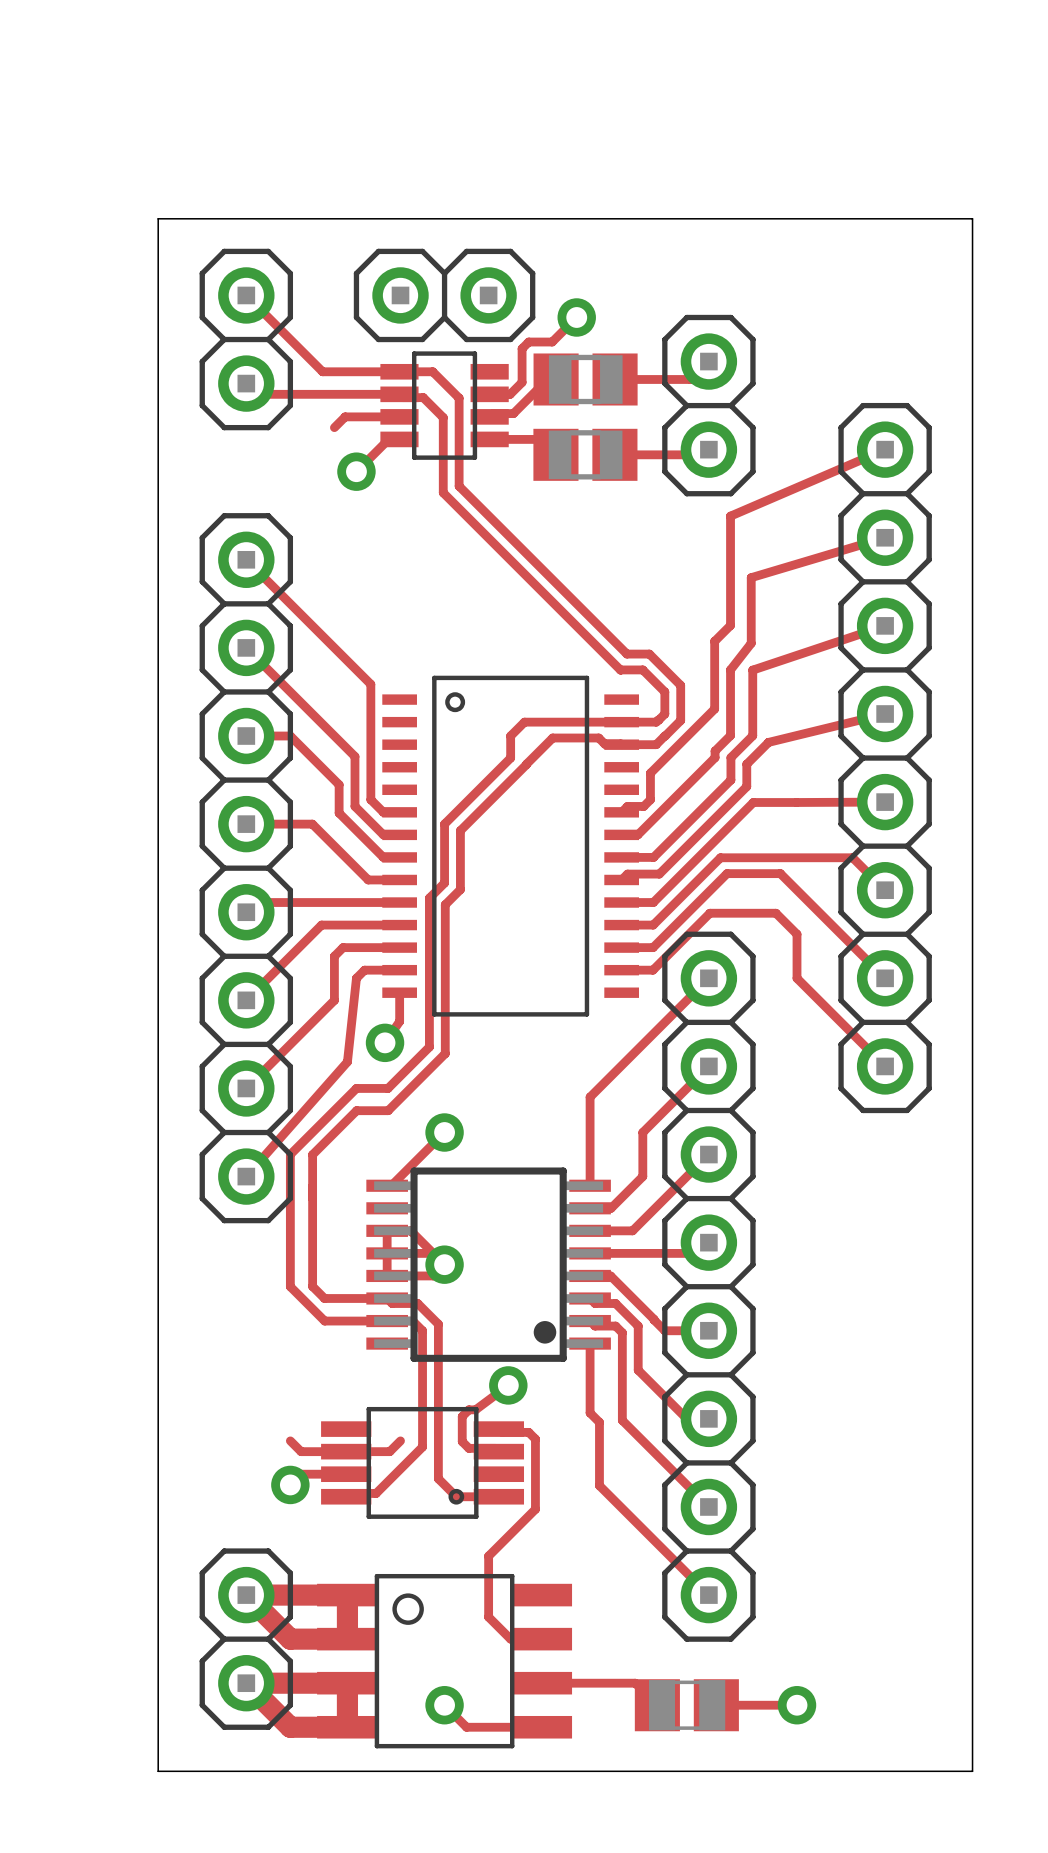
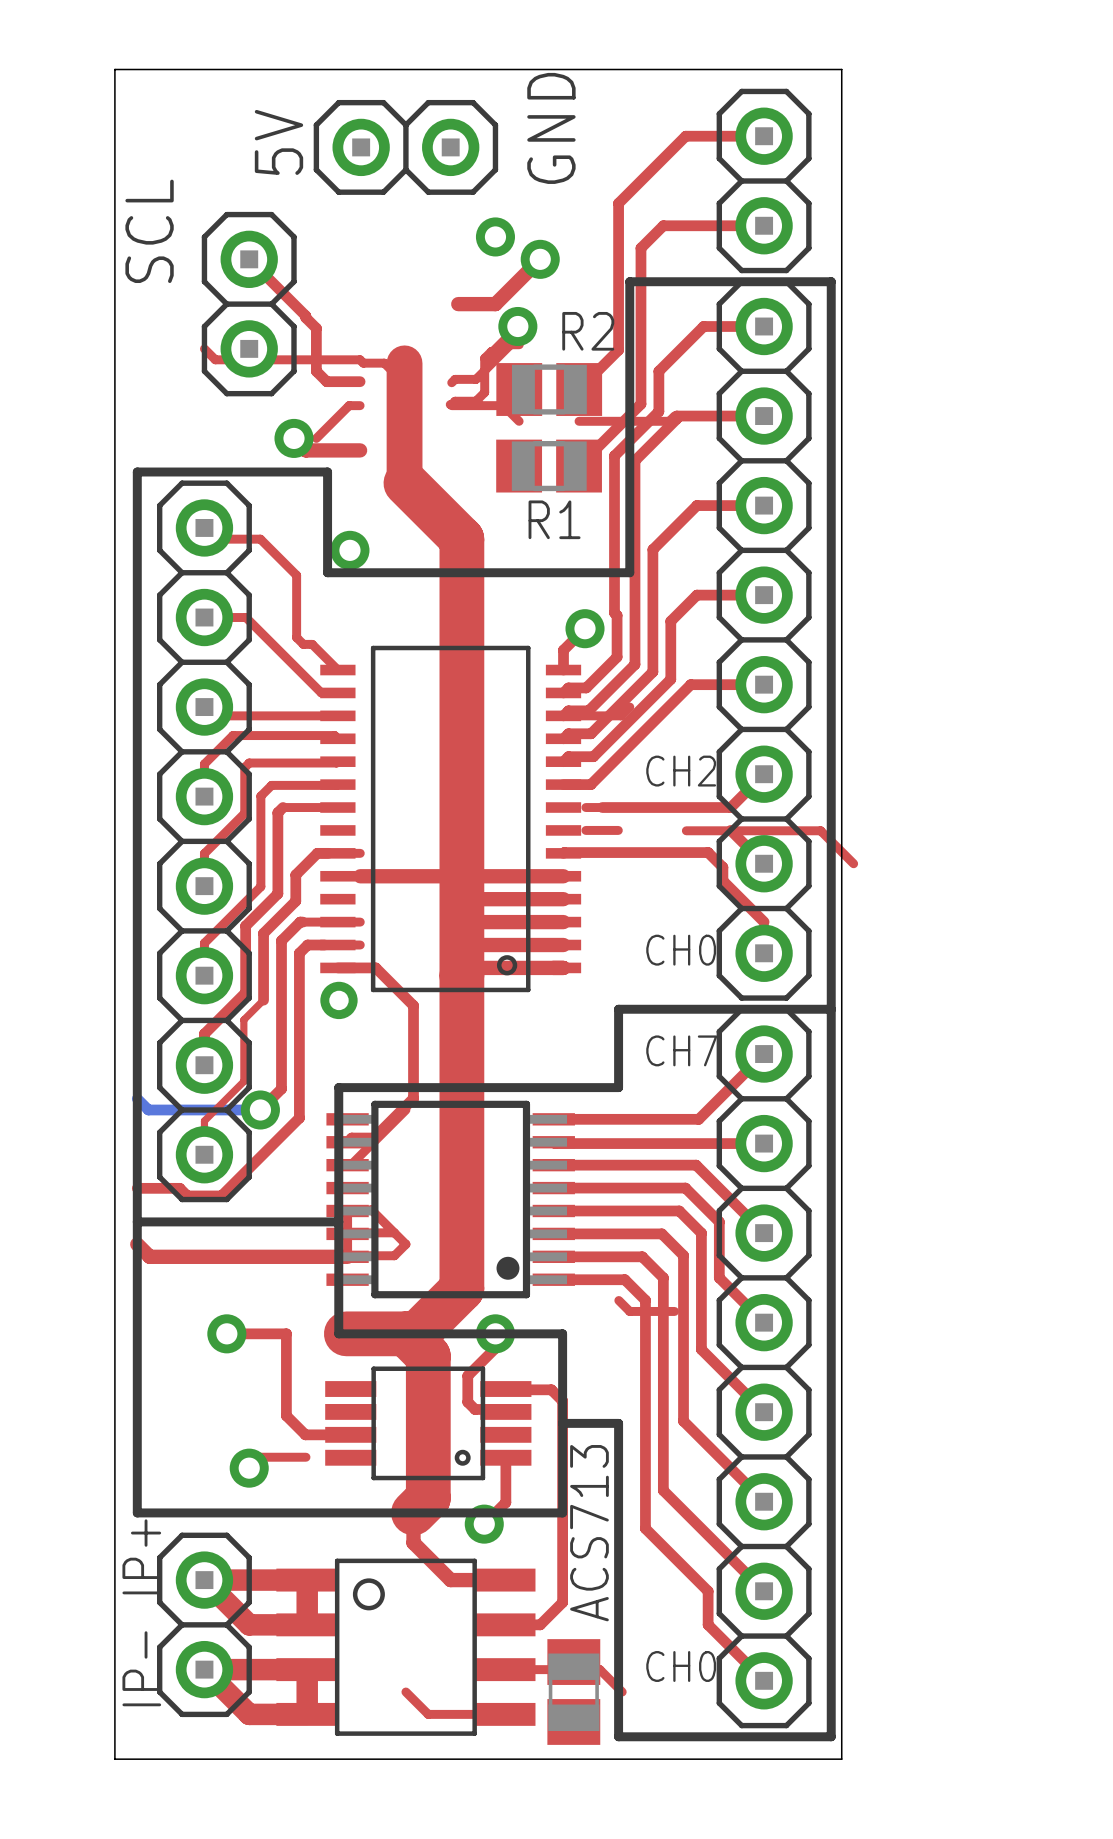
text: none -> GND (551, 128)
top track: none -> (764, 136) (685, 136) (618, 203) (618, 350) (579, 389)
text: none -> 5V (278, 142)
part: none -> (405, 147)
board edge: (158, 218) (972, 218) (972, 1771) (873, 1771) -> (114, 181) (114, 69) (841, 69) (841, 1759)
part: none -> (764, 180)
top track: none -> (764, 225) (663, 225) (640, 248) (640, 404) (579, 466)
text: none -> SCL (149, 231)
via: none -> (495, 236)
top track: (246, 295) (322, 371) (432, 371) (459, 398) (459, 486) (626, 654) (649, 654) (680, 685) (680, 720) (665, 736) -> none
part: (444, 295) -> none
top track: none -> (540, 259) (495, 304) (458, 304)
top track: (576, 317) (552, 342) (528, 342) (522, 348) (522, 382) (510, 394) (489, 394) -> none
via position: (576, 317) -> (540, 259)
part position: (246, 339) -> (249, 304)
top track: none -> (517, 326) (484, 358) (484, 392) (475, 401) (455, 401) (450, 404)
via: none -> (517, 326)
top track: (708, 361) (690, 379) (615, 379) -> none
top track: none -> (764, 326) (703, 326) (658, 371) (658, 411) (614, 455) (614, 612) (617, 615) (617, 657) (586, 687) (568, 687) (563, 692)
part: (585, 379) -> none
part: (444, 405) -> none
part: (708, 405) -> none
top track: (399, 416) (345, 416) (334, 427) -> (360, 381) (326, 381) (316, 371) (316, 328) (249, 259)
top track width: thin (443, 417) (443, 492) -> thick (404, 383) (404, 459)
R2: none -> (549, 389)
top track: none -> (764, 416) (676, 416) (676, 418) (634, 460) (634, 664) (588, 710) (568, 710) (563, 715)
top track: (885, 449) (730, 516) (730, 625) (714, 641) (714, 709) (650, 773) (650, 799) (643, 806) (627, 806) (621, 812) -> none
part: (585, 454) -> none
top track: none -> (293, 438) (305, 450) (360, 450)
via position: (356, 471) -> (293, 438)
top track: (443, 492) (620, 670) -> (404, 459) (404, 481) (461, 539) (461, 1289) (417, 1333) (346, 1333)
R1: none -> (549, 466)
top track: none -> (764, 505) (696, 505) (652, 549) (652, 671) (591, 733) (568, 733) (563, 738)
top track: (885, 537) (751, 577) (751, 643) (730, 669) (730, 735) (715, 751) (715, 757) (637, 834) -> (764, 774) (730, 807) (602, 807)
top track: (257, 570) (370, 684) (370, 799) (383, 812) (399, 812) -> (215, 539) (260, 539) (296, 575) (296, 637) (303, 644) (312, 644) (337, 670)
via: none -> (349, 550)
top track: none -> (764, 595) (696, 595) (670, 621) (670, 679) (593, 756) (568, 756) (563, 761)
top track: (885, 625) (752, 670) (752, 735) (730, 757) (730, 780) (653, 857) -> none
top track: (246, 647) (354, 756) (354, 806) (383, 834) (399, 834) -> (204, 617) (245, 617) (321, 692) (337, 692)
top track: none -> (585, 628) (563, 650) (563, 670)
via: none -> (585, 628)
top track: (620, 669) (642, 669) (664, 691) (664, 713) (656, 722) (524, 722) (510, 736) (510, 758) (444, 824) (444, 883) (429, 898) (429, 1047) (388, 1088) (356, 1088) (290, 1154) (290, 1286) (324, 1321) (412, 1321) (422, 1330) (422, 1447) (376, 1493) (349, 1493) (346, 1496) -> none
top track: none -> (764, 684) (690, 684) (590, 784) (563, 784)
top track: (885, 713) (768, 742) (746, 764) (746, 786) (659, 874) (627, 874) (621, 879) -> none
top track: (246, 736) (290, 736) (339, 784) (339, 813) (383, 857) (399, 857) -> (204, 707) (213, 715) (337, 715)
top track: (621, 744) (604, 743) (598, 738) (552, 738) (526, 764) -> none
part position: (885, 758) -> (764, 639)
top track: (526, 764) (460, 830) (460, 889) (445, 904) (445, 1053) (388, 1110) (356, 1110) (312, 1154) (312, 1286) (324, 1298) (387, 1298) (392, 1303) (417, 1303) (438, 1324) (438, 1478) (456, 1496) (498, 1496) -> none
text: none -> CH2 (681, 771)
top track: (885, 802) (753, 802) (653, 902) (621, 902) -> none
top track: (246, 824) (312, 824) (368, 879) -> (204, 796) (204, 764) (232, 735) (334, 735) (337, 738)
top track: none -> (283, 807) (277, 812) (277, 893) (245, 925) (245, 992) (204, 1033) (204, 1065)
top track: none -> (283, 807) (337, 807)
part rotation: 0° (510, 846) -> 180° (450, 818)
top track: (720, 857) (653, 925) (621, 925) -> none
top track: (780, 873) (727, 873) (653, 947) (621, 947) -> (747, 846) (730, 830)
top track: none -> (328, 853) (317, 853) (295, 874) (295, 901) (263, 933) (263, 1000) (243, 1019) (243, 1081) (204, 1120) (204, 1154)
top track: (797, 890) (885, 978) -> none
top track: (377, 902) (256, 902) (246, 912) -> (337, 761) (249, 763) (244, 767) (244, 813) (204, 853) (204, 886)
top track: none -> (360, 876) (563, 876)
top track: none -> (461, 897) (463, 899) (563, 899)
top track: (399, 925) (321, 925) (246, 1000) -> (337, 784) (271, 785) (260, 796) (260, 886) (204, 943) (204, 975)
top track: none -> (461, 919) (473, 919) (475, 922) (563, 922)
top track: (343, 947) (334, 956) (334, 1000) (246, 1088) -> (302, 922) (300, 922) (281, 940) (281, 1088) (260, 1109)
top track: (797, 947) (797, 934) (775, 913) (709, 913) (652, 970) (621, 970) -> (764, 922) (722, 880) (722, 867) (708, 852) (563, 853)
top track: none -> (461, 942) (464, 945) (563, 945)
top track: (364, 970) (356, 978) (347, 1061) (246, 1176) -> (324, 945) (307, 945) (299, 953) (299, 1118) (221, 1195) (187, 1195) (179, 1188) (137, 1188)
text: none -> CH0 (681, 950)
top track: (708, 978) (590, 1097) (590, 1185) -> (764, 1233) (696, 1165) (553, 1165)
top track: (797, 978) (885, 1066) -> none
top track: none -> (337, 967) (375, 967) (413, 1005) (413, 1098) (373, 1138) (351, 1138) (347, 1142)
top track: (399, 992) (399, 1021) (385, 1042) -> none
top track: none -> (563, 967) (469, 967) (461, 975)
line: none -> (831, 1009) (618, 1009) (618, 1087) (338, 1087) (338, 1333) (562, 1333) (562, 1512) (137, 1512) (137, 472) (327, 472) (327, 572) (629, 572) (629, 281) (831, 281) (831, 1736) (618, 1736) (618, 1423) (562, 1423)
via position: (385, 1042) -> (338, 1000)
top track: (708, 1066) (642, 1132) (642, 1176) (611, 1208) (590, 1208) -> (764, 1322) (719, 1277) (719, 1221) (685, 1188) (553, 1188)
text: none -> CH7 (681, 1050)
top track: none -> (764, 1054) (698, 1119) (553, 1119)
bottom track: none -> (137, 1098) (148, 1109) (260, 1109)
via: none -> (260, 1109)
via: (444, 1132) -> none
top track: (708, 1154) (632, 1230) (590, 1230) -> (764, 1412) (701, 1349) (701, 1233) (679, 1210) (553, 1210)
top track: none -> (553, 1142) (764, 1143)
line: none -> (137, 1221) (338, 1221)
top track: (708, 1242) (698, 1253) (590, 1253) -> (764, 1501) (683, 1421) (683, 1255) (661, 1233) (553, 1233)
top track: none -> (137, 1244) (149, 1256) (347, 1256)
via: (444, 1264) -> none
part position: (488, 1264) -> (450, 1199)
top track: (590, 1275) (610, 1275) (654, 1319) -> (553, 1256) (642, 1256) (663, 1277) (663, 1490) (764, 1591)
part position: (708, 1286) -> (764, 1367)
top track: (590, 1298) (595, 1303) (615, 1303) (638, 1326) (638, 1370) (686, 1418) (708, 1418) -> (553, 1279) (624, 1279) (645, 1300) (645, 1528) (708, 1591) (708, 1624) (764, 1680)
top track: (590, 1321) (595, 1326) (615, 1326) (622, 1332) (622, 1420) (708, 1506) -> none
top track: (590, 1343) (590, 1412) (599, 1422) (599, 1485) (708, 1595) -> none
top track: none -> (226, 1333) (286, 1333) (286, 1415) (305, 1434) (350, 1434)
via: none -> (226, 1333)
top track: none -> (405, 1333) (428, 1356) (428, 1498) (413, 1512) (413, 1542) (450, 1580) (504, 1580)
top track: none -> (495, 1333) (495, 1348) (467, 1375) (467, 1402) (475, 1409) (503, 1409) (505, 1411)
top track: (508, 1385) (475, 1409) (468, 1409) (462, 1416) (462, 1441) (468, 1448) (495, 1448) (498, 1451) -> none
via position: (508, 1385) -> (495, 1333)
top track: (498, 1429) (502, 1432) (528, 1432) (535, 1439) (535, 1509) (488, 1556) (488, 1617) (510, 1639) (541, 1639) -> (505, 1389) (551, 1389) (562, 1401) (562, 1602) (540, 1624) (504, 1624)
top track: (290, 1440) (301, 1451) (389, 1451) (400, 1440) -> none
part position: (422, 1462) -> (428, 1423)
top track: none -> (505, 1457) (505, 1502) (484, 1524)
via: none -> (484, 1524)
text: none -> ACS713 (589, 1533)
text: none -> IP+ (141, 1556)
text: none -> CH0 (681, 1666)
text: none -> IP- (141, 1668)
via: (444, 1705) -> none
part rotation: 0° (686, 1705) -> 90° clockwise (573, 1692)
part position: (686, 1705) -> (573, 1692)
top track: (716, 1705) (797, 1705) -> none
via: (797, 1705) -> none

